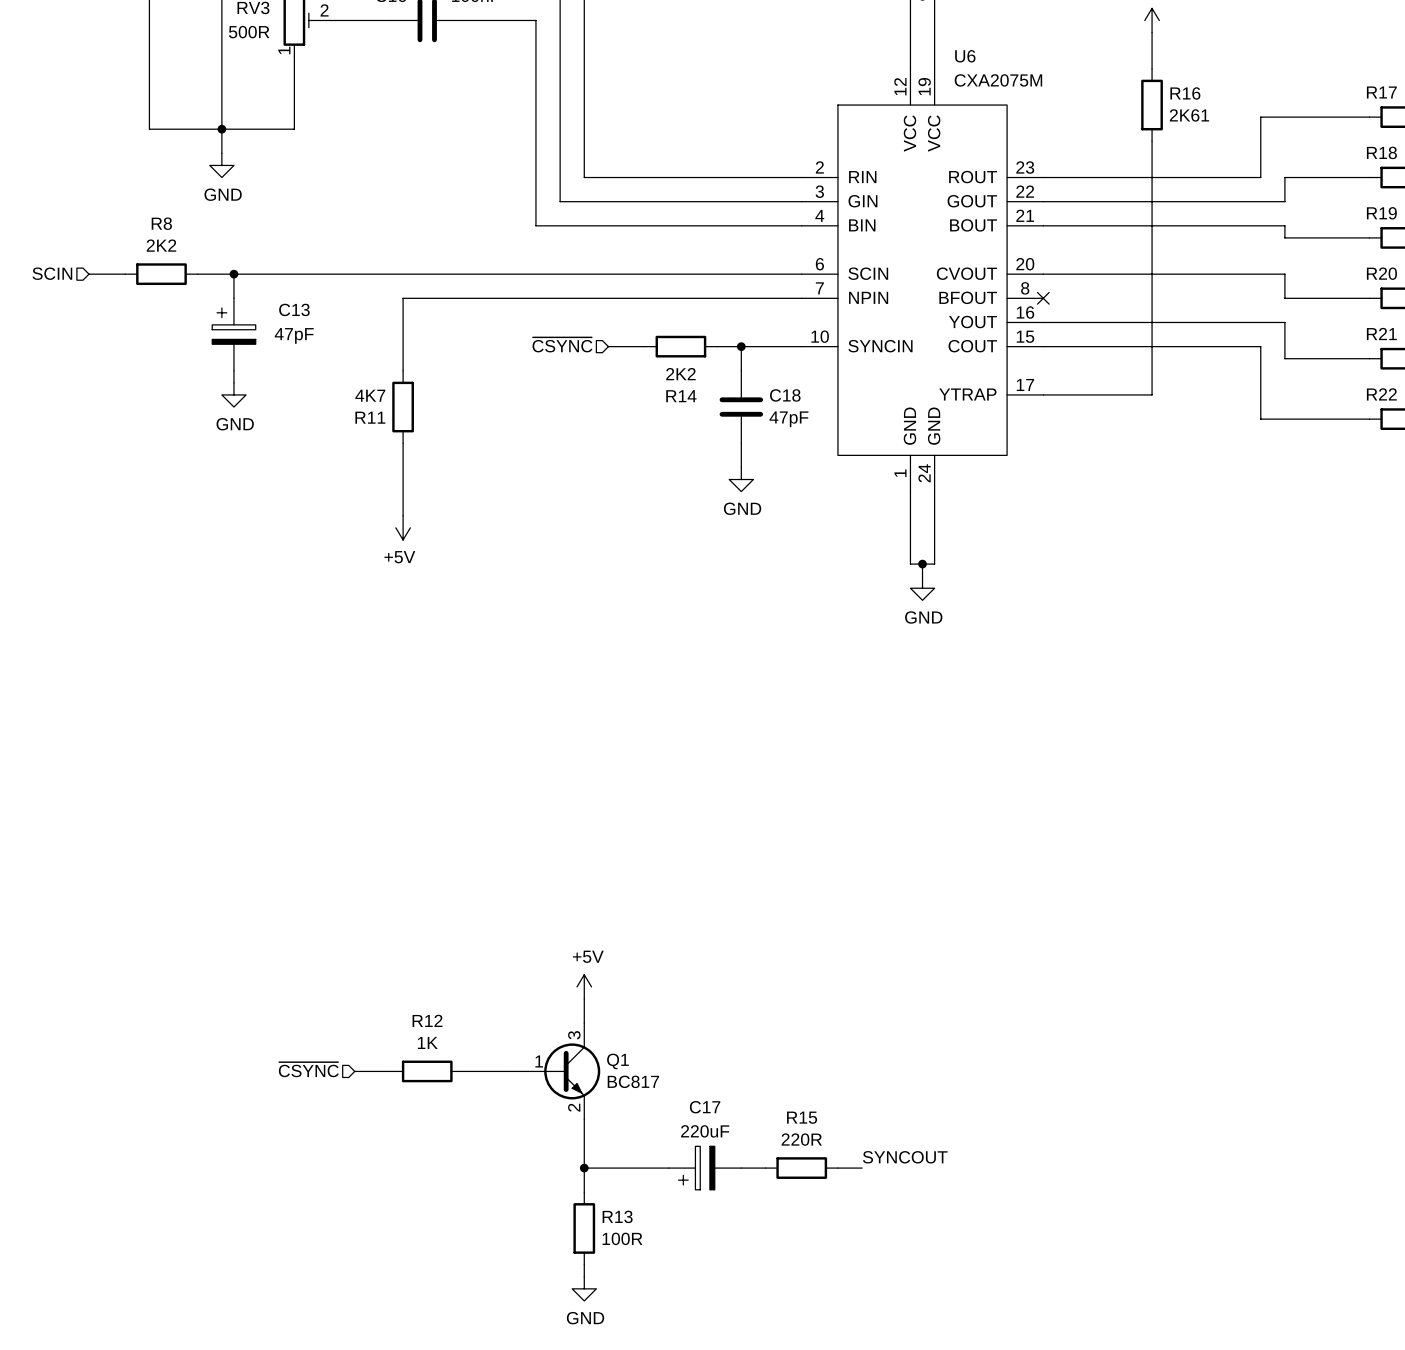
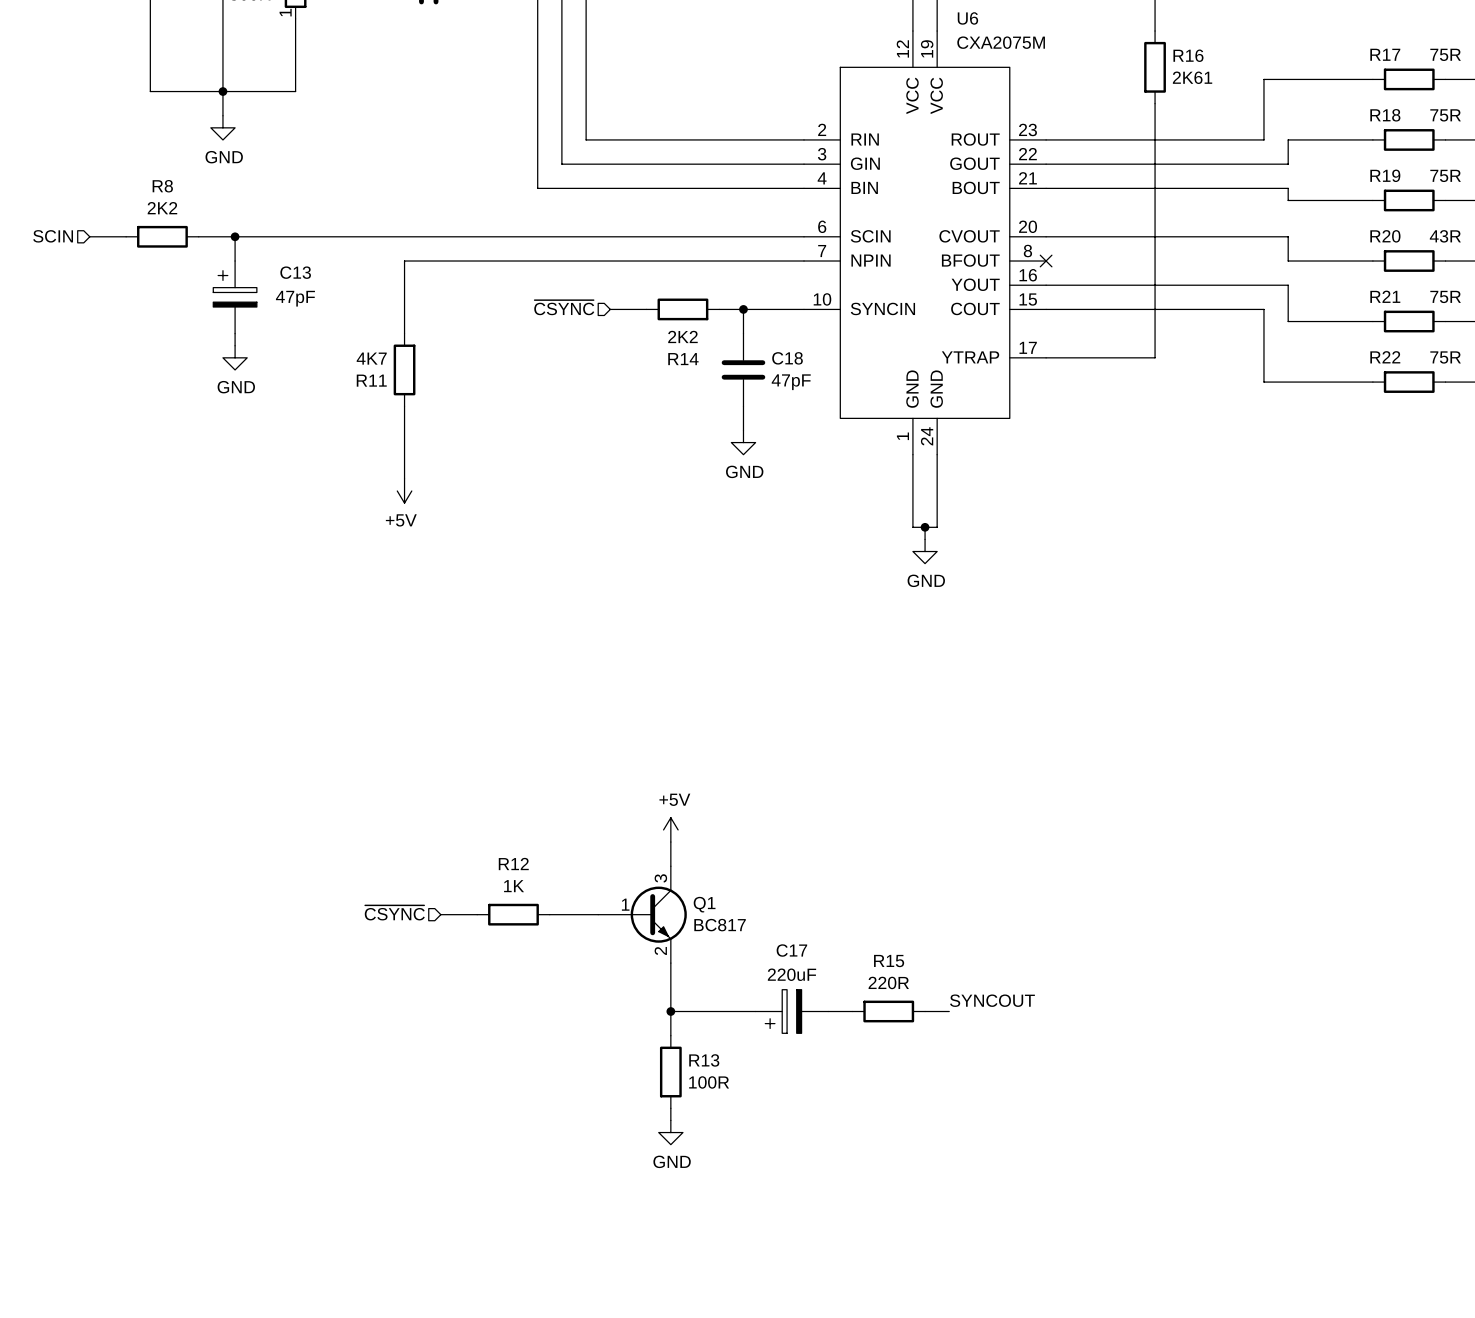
power symbol position: +5V (584, 986) -> +5V (670, 829)
wire: (584, 998) (584, 1023) -> (670, 842) (670, 866)
junction: none -> (670, 1011)
hierarchical label position: ~{CSYNC} (308, 1069) -> ~{CSYNC} (394, 912)
wire: (354, 1071) (391, 1071) -> (440, 914) (477, 914)
R12 position: (427, 1071) -> (513, 914)
wire: (463, 1071) (511, 1071) -> (549, 914) (598, 914)
Q1 position: (556, 1071) -> (642, 914)
wire: (584, 1119) (584, 1192) -> (670, 963) (670, 1035)
label position: SYNCOUT (905, 1157) -> SYNCOUT (992, 1000)
wire: (584, 1168) (668, 1168) -> (670, 1011) (755, 1011)
junction: (584, 1168) -> none
C17 position: (705, 1168) -> (791, 1011)
wire: (741, 1168) (765, 1168) -> (828, 1011) (852, 1011)
R15 position: (801, 1168) -> (888, 1011)
wire: (837, 1168) (862, 1168) -> (925, 1011) (949, 1011)
R13 position: (584, 1228) -> (670, 1072)
wire: (584, 1264) (584, 1276) -> (670, 1108) (670, 1120)
power symbol position: GND (584, 1288) -> GND (670, 1132)

